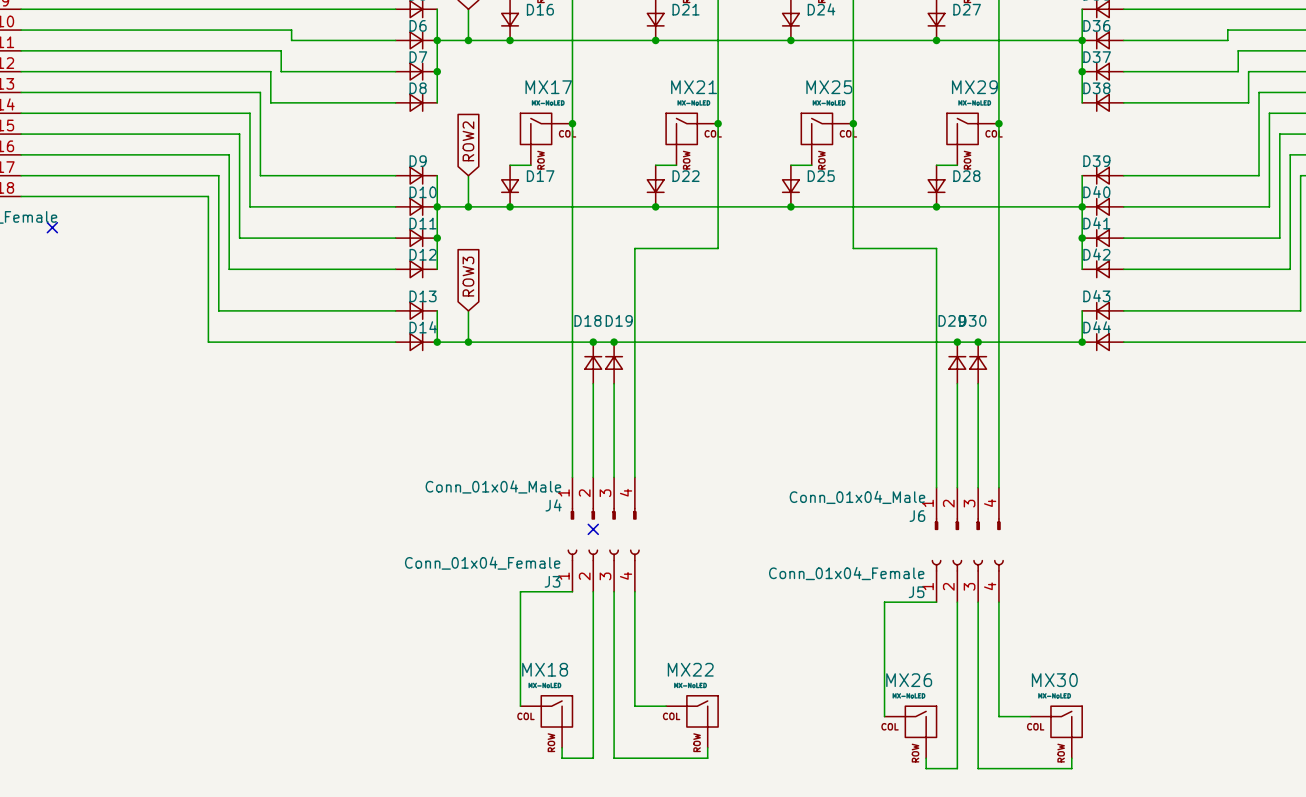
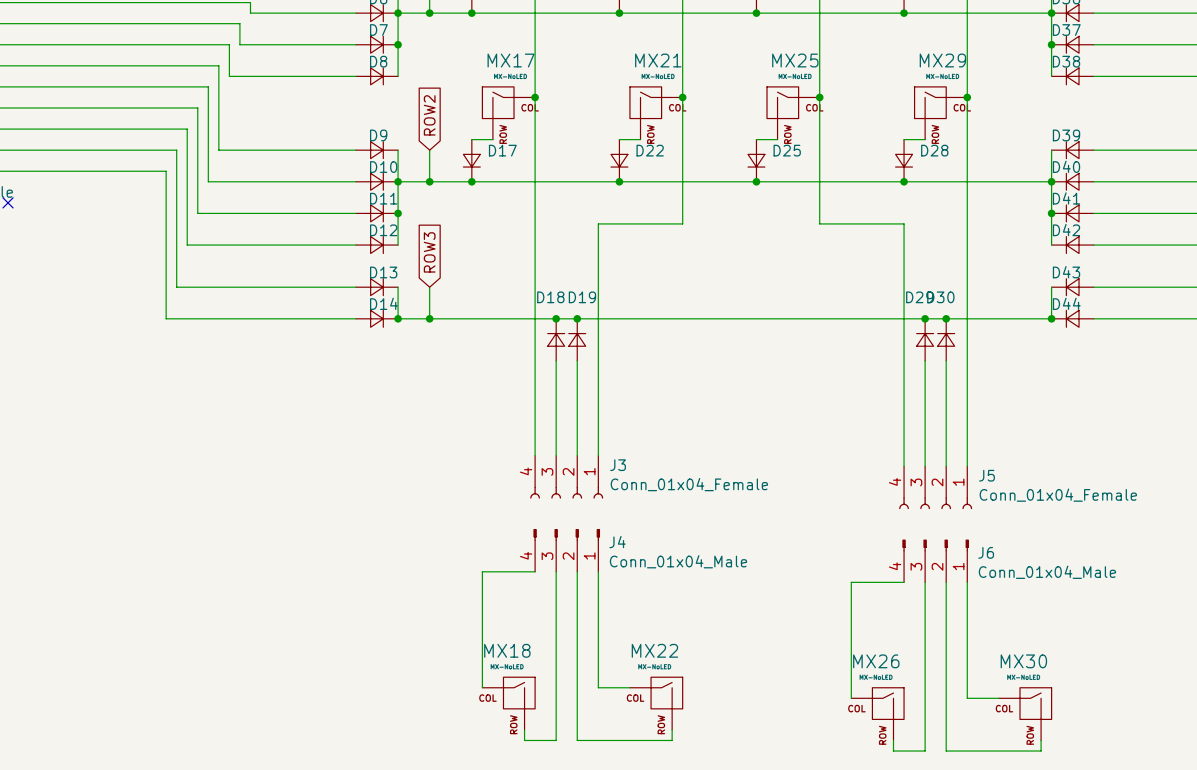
J4 position: (603, 498) -> (566, 550)
J6 position: (967, 508) -> (935, 560)
J4 rotation: 0° (603, 513) -> 180° (566, 534)
J6 rotation: 0° (967, 524) -> 180° (935, 545)
no-connect mark: (593, 529) -> none
J3 rotation: 0° (603, 555) -> 180° (566, 492)
J5 rotation: 0° (967, 565) -> 180° (935, 503)
J3 position: (603, 570) -> (566, 477)
J5 position: (967, 581) -> (935, 487)

